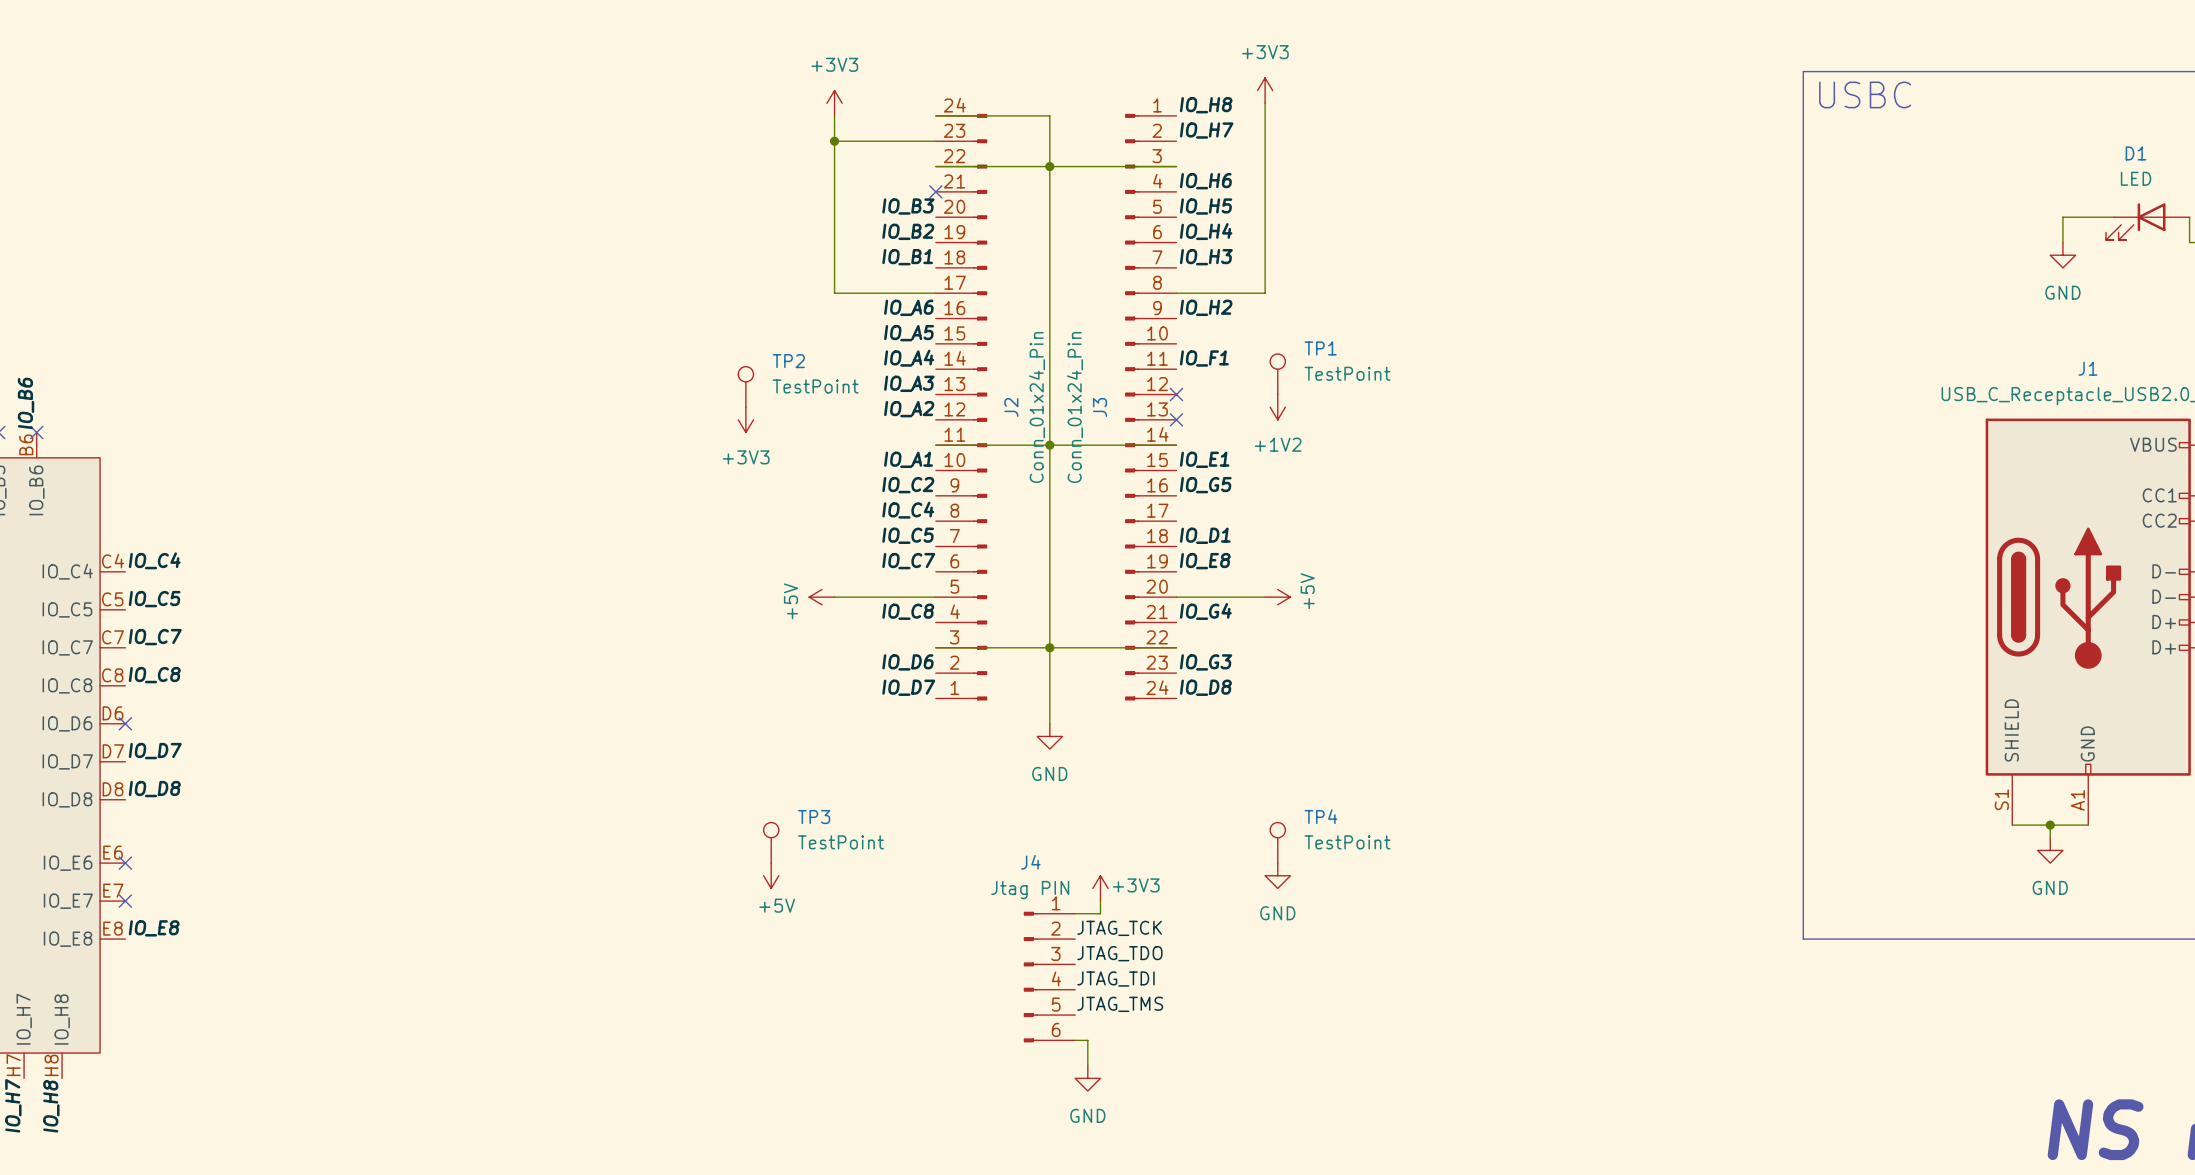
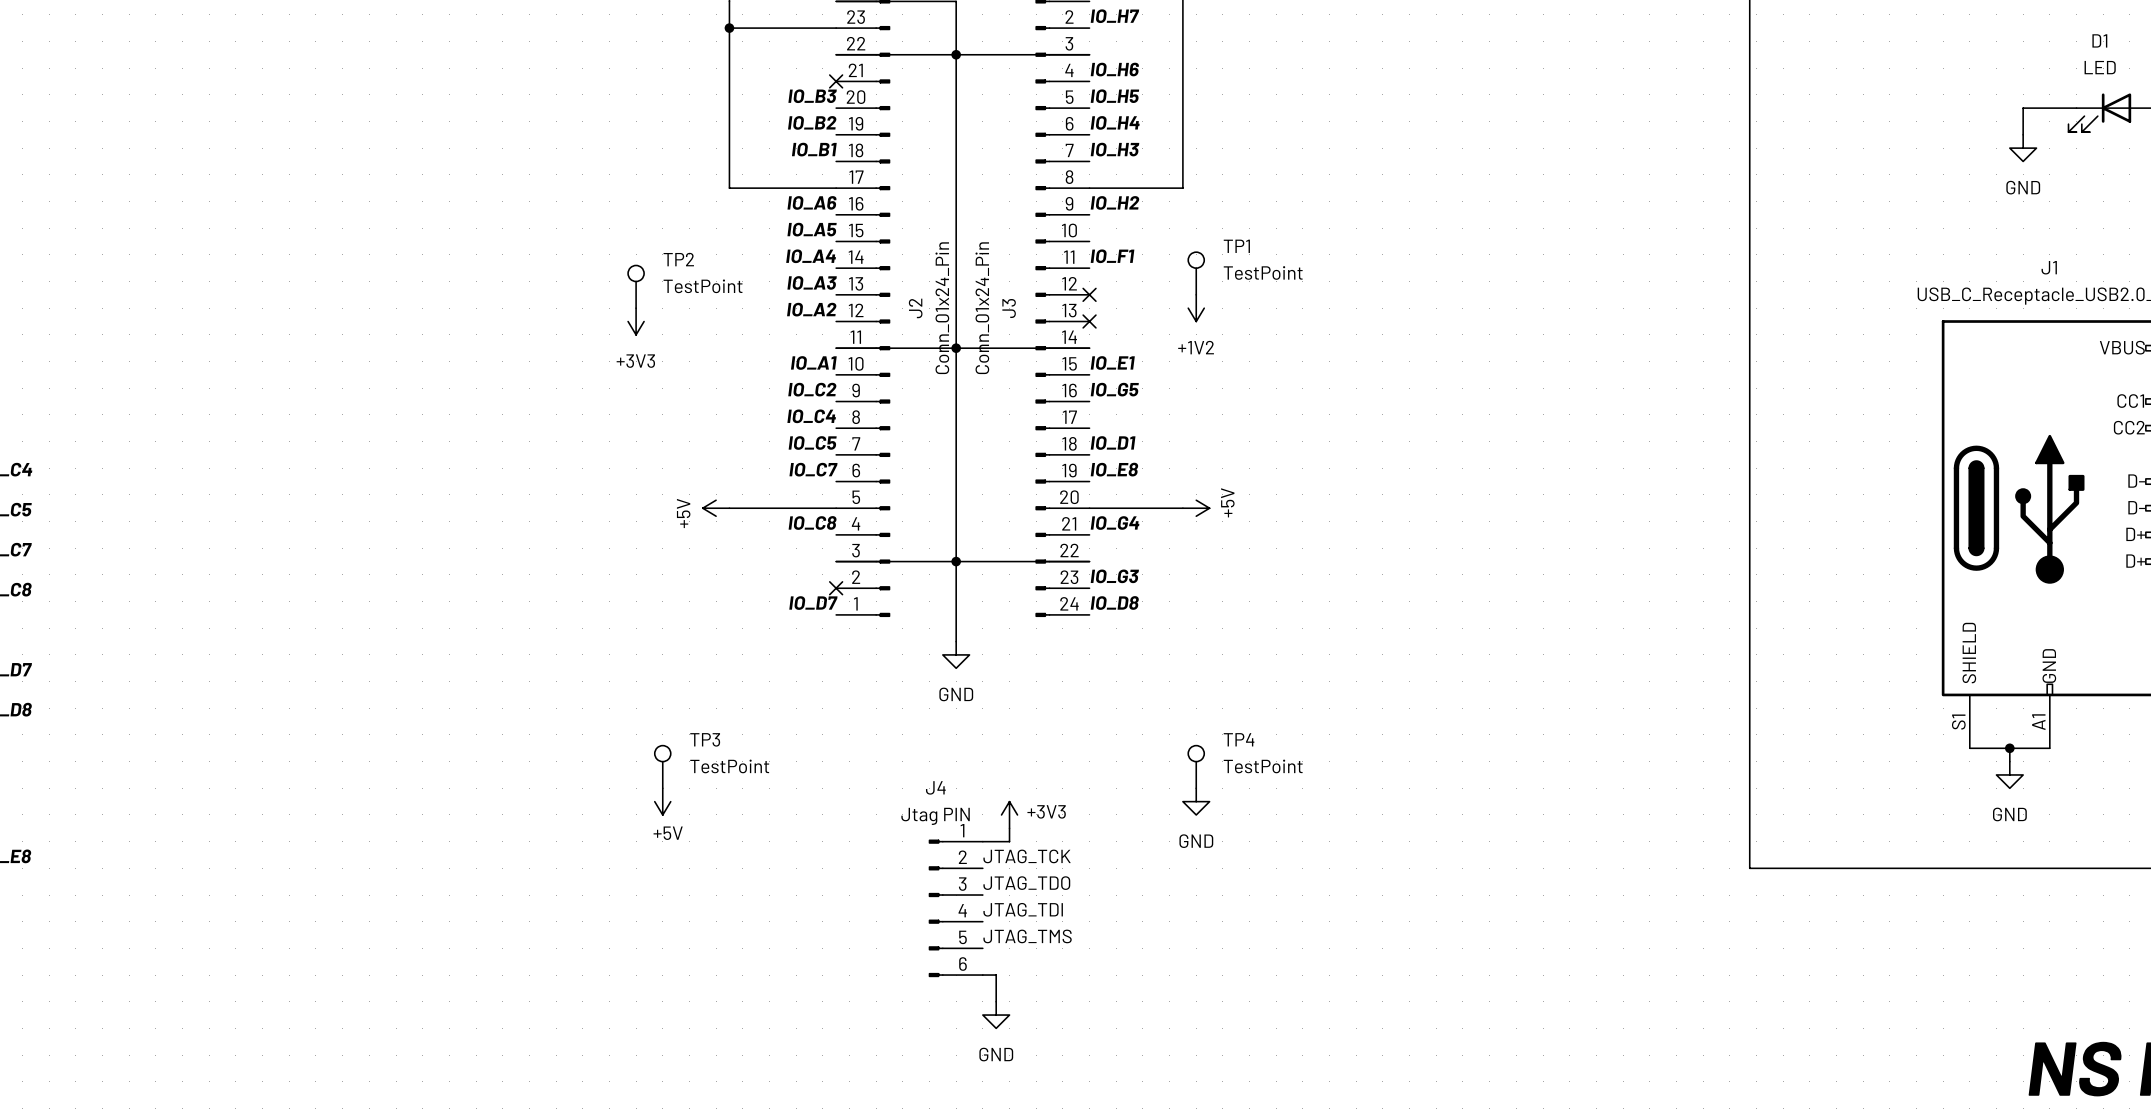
label: IO_D6 (907, 662) -> none
no-connect mark: none -> (836, 588)

